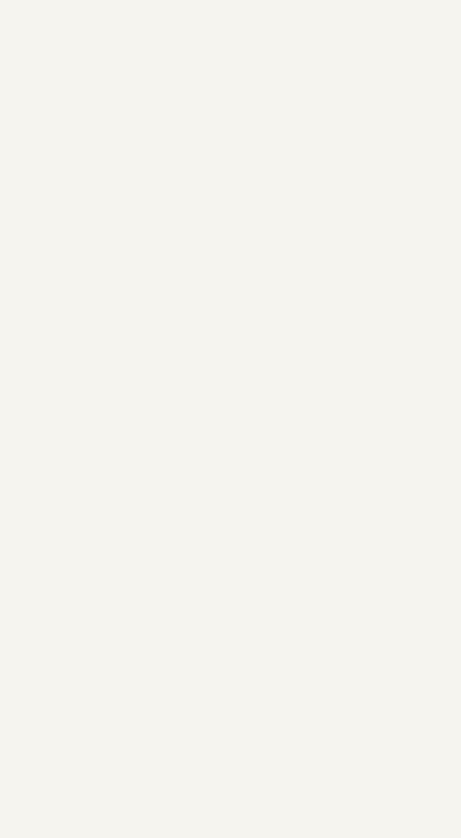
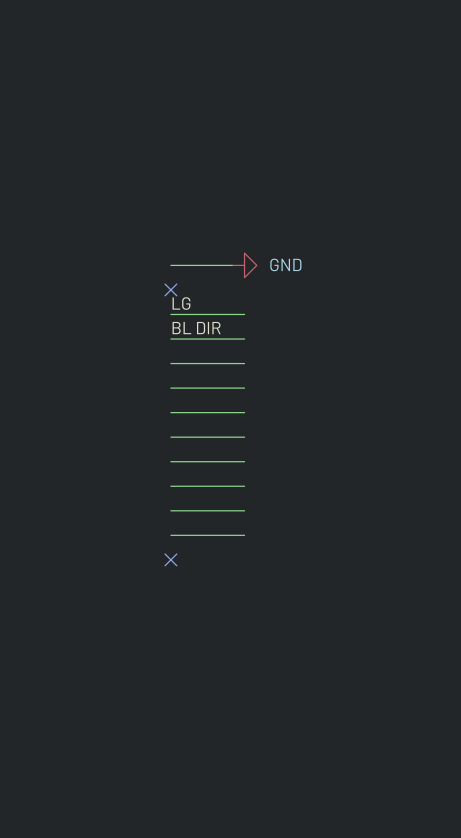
wire: none -> (170, 265) (232, 265)
power symbol: none -> GND (244, 265)
no-connect mark: none -> (170, 289)
label: none -> LG (181, 303)
wire: none -> (170, 314) (244, 314)
label: none -> BL DIR (196, 328)
wire: none -> (170, 339) (244, 339)
wire: none -> (170, 363) (244, 363)
wire: none -> (170, 388) (244, 388)
wire: none -> (170, 412) (244, 412)
wire: none -> (170, 437) (244, 437)
wire: none -> (170, 461) (244, 461)
wire: none -> (170, 486) (244, 486)
wire: none -> (170, 510) (244, 510)
wire: none -> (170, 535) (244, 535)
no-connect mark: none -> (170, 559)

